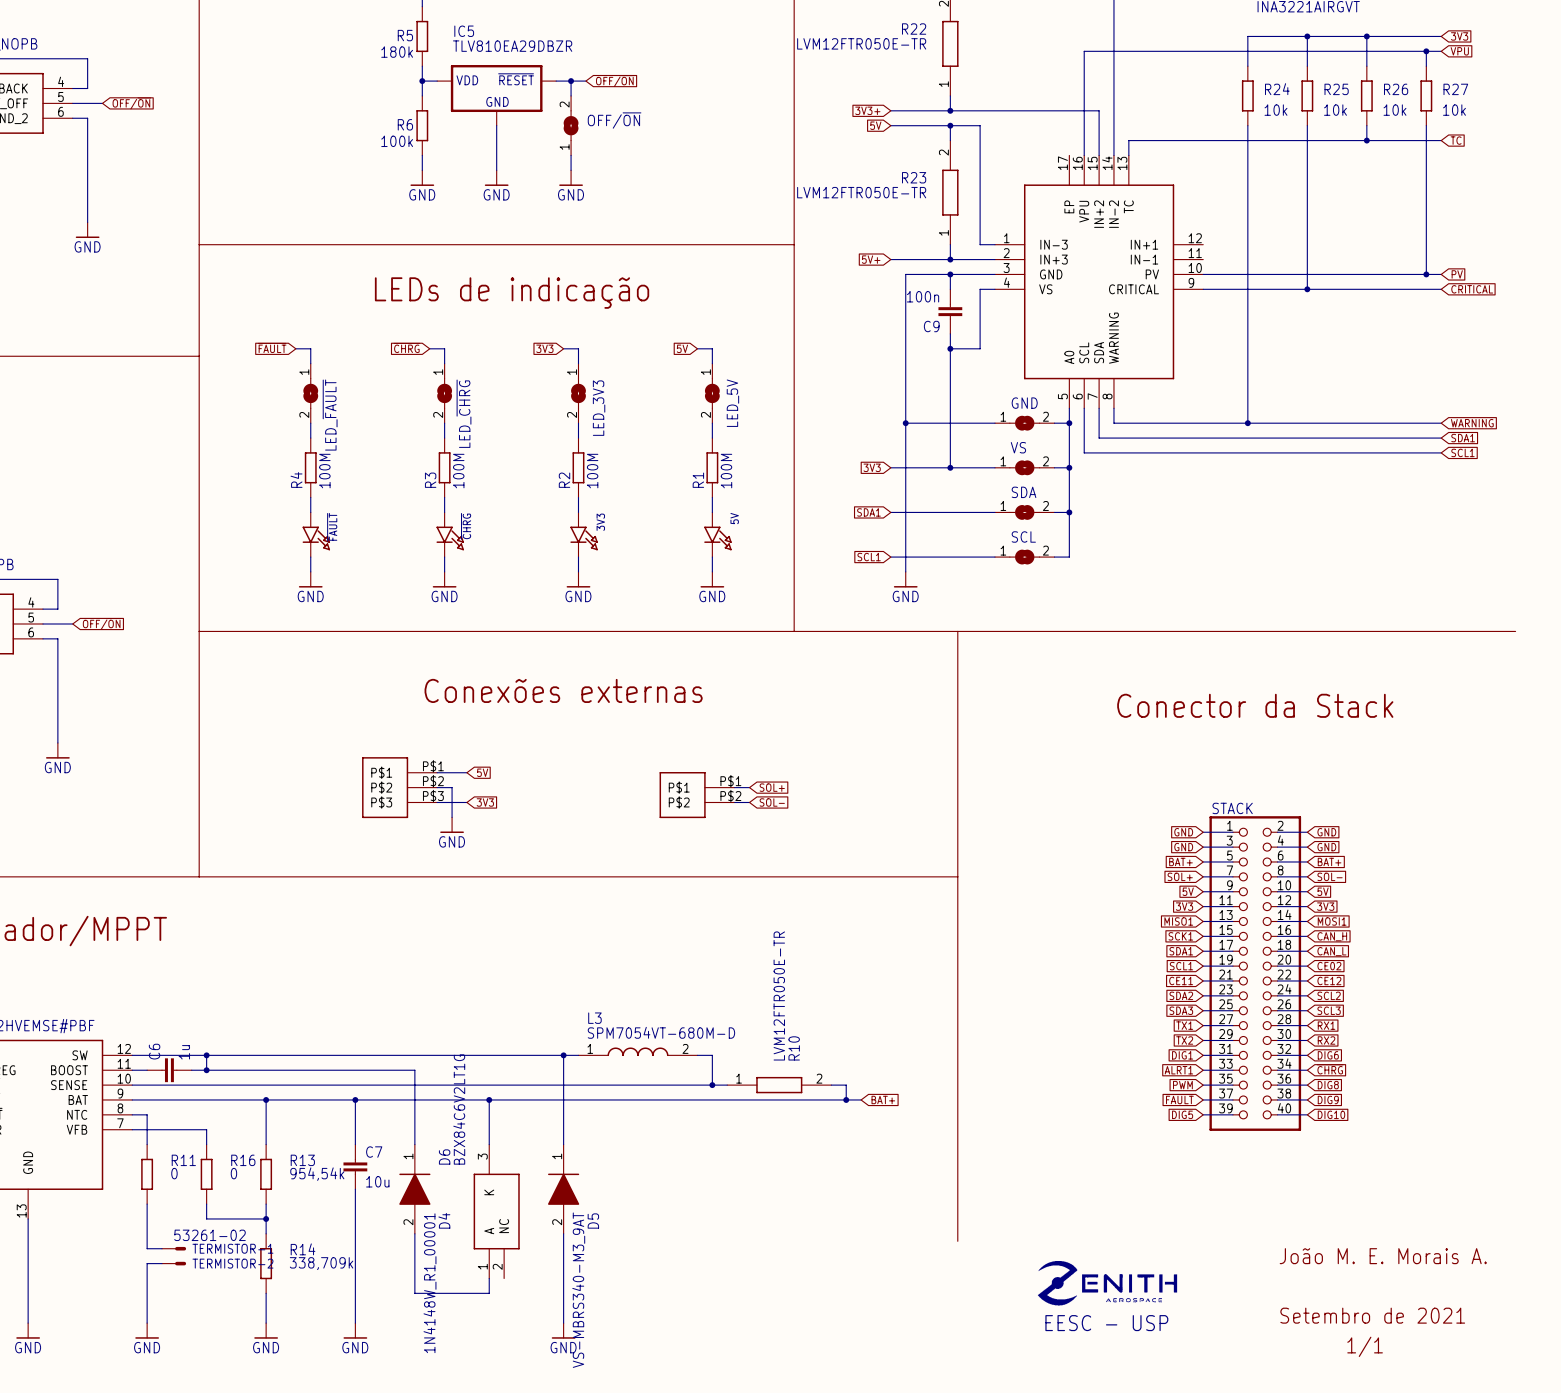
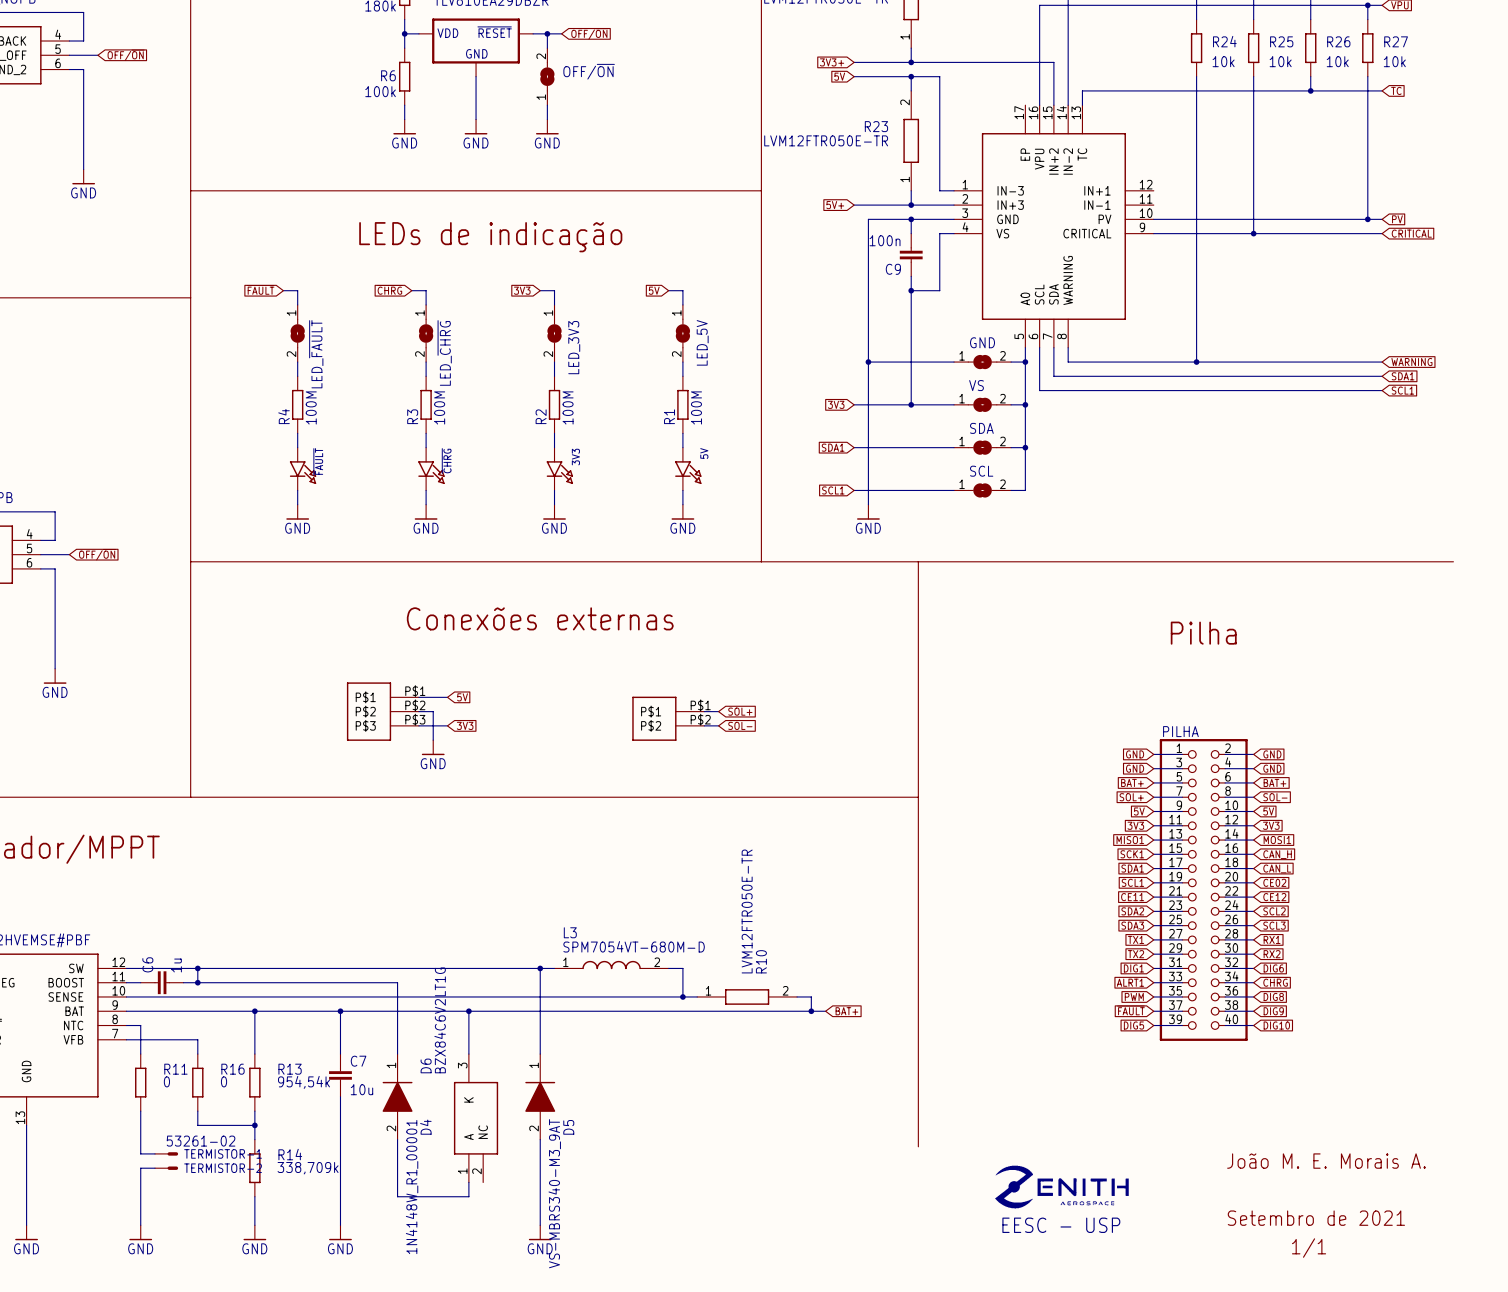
text: Conector da Stack (1255, 705) -> Pilha (1203, 633)
STACK name: STACK (1232, 808) -> PILHA (1180, 731)

